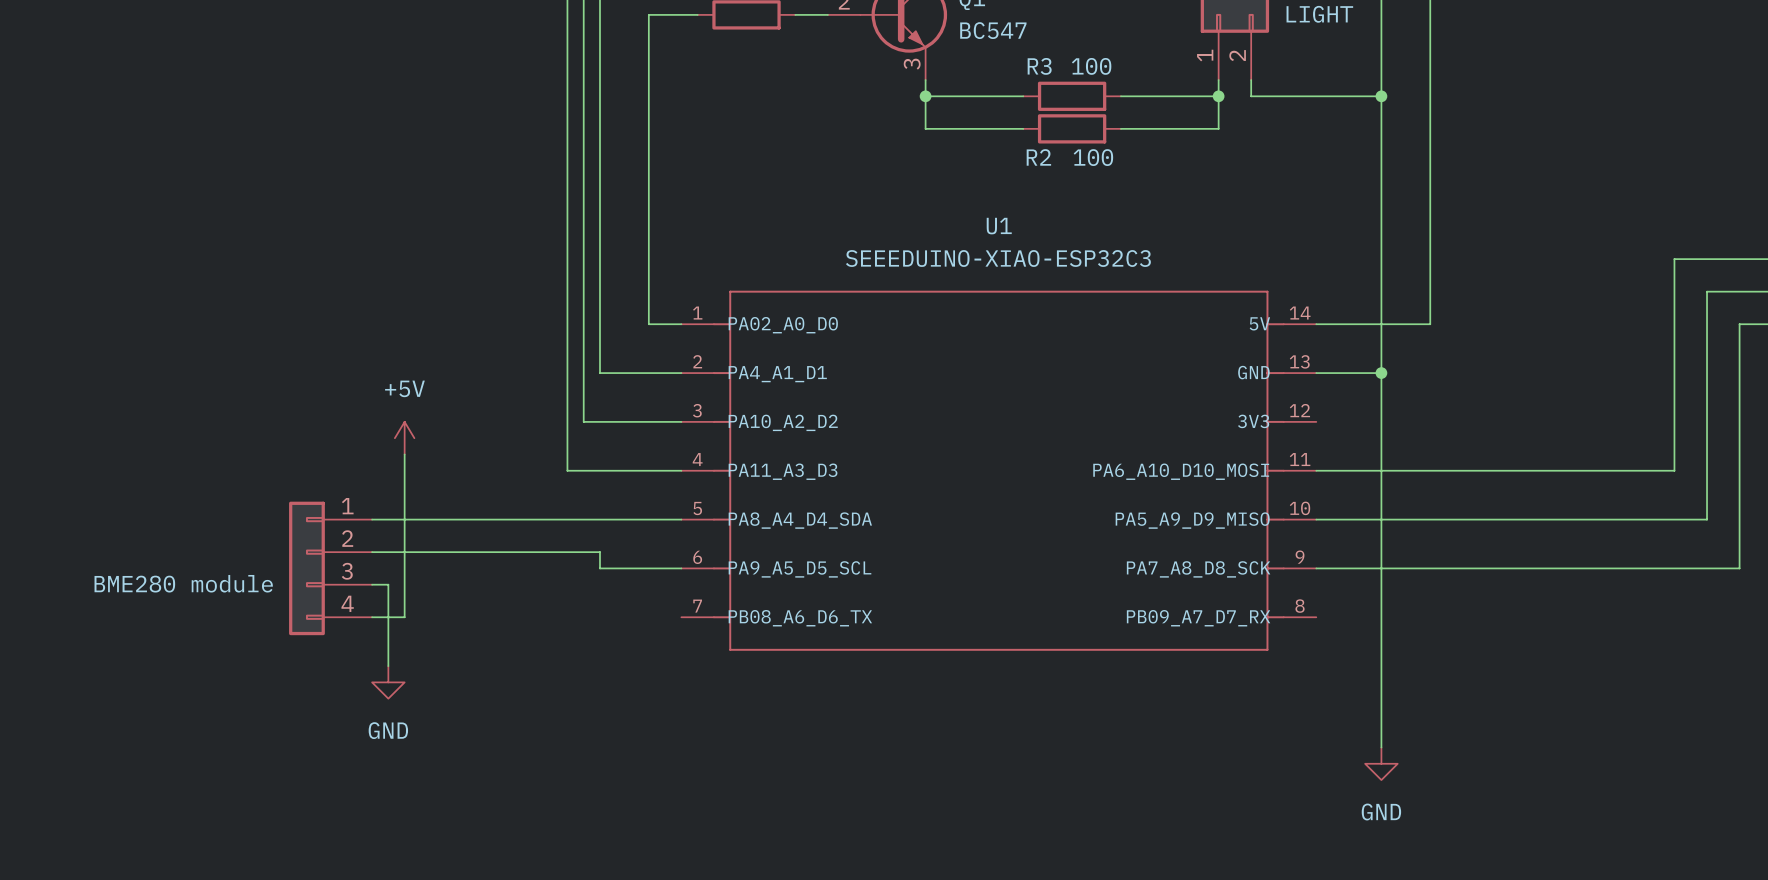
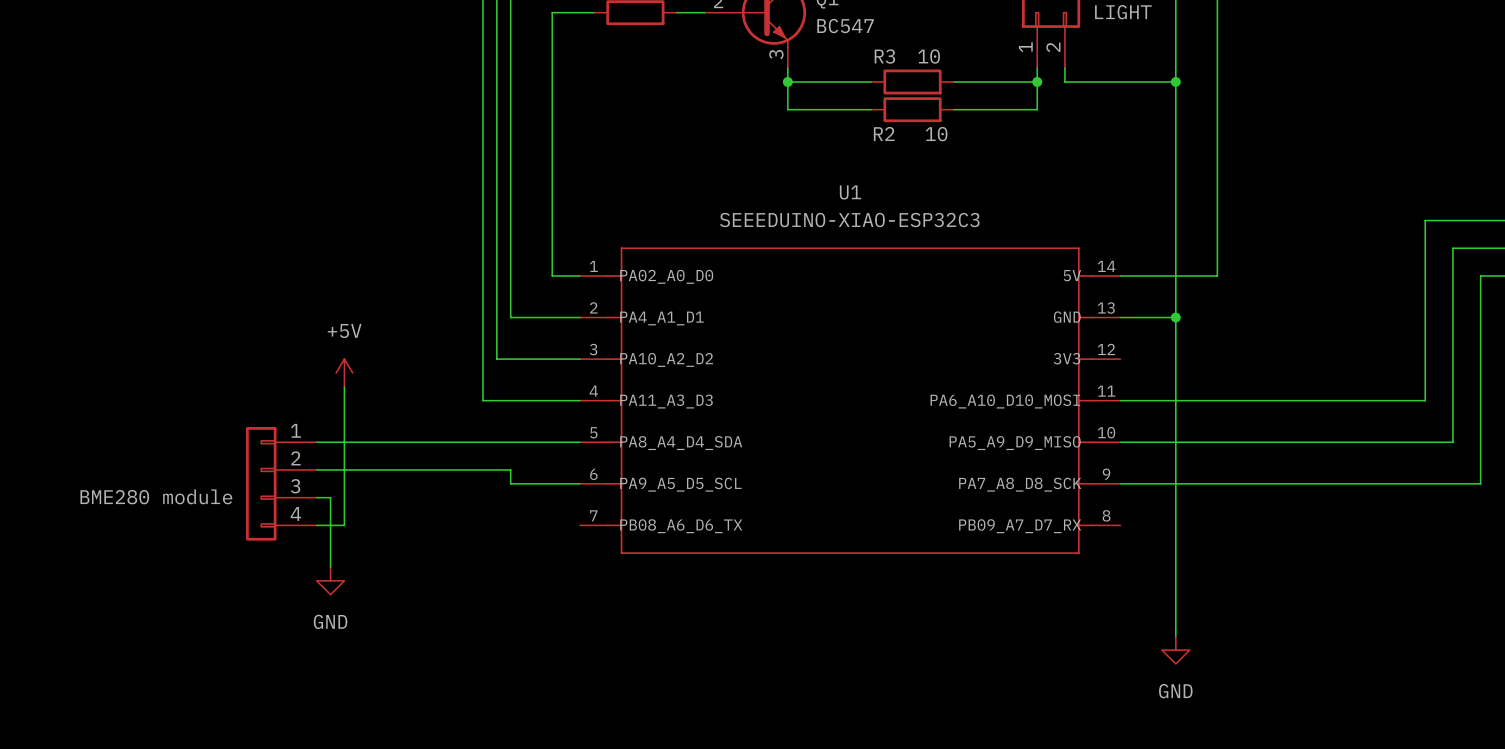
R3 value: 100 (1091, 66) -> 10 (929, 56)
R2 value: 100 (1093, 157) -> 10 (936, 134)

